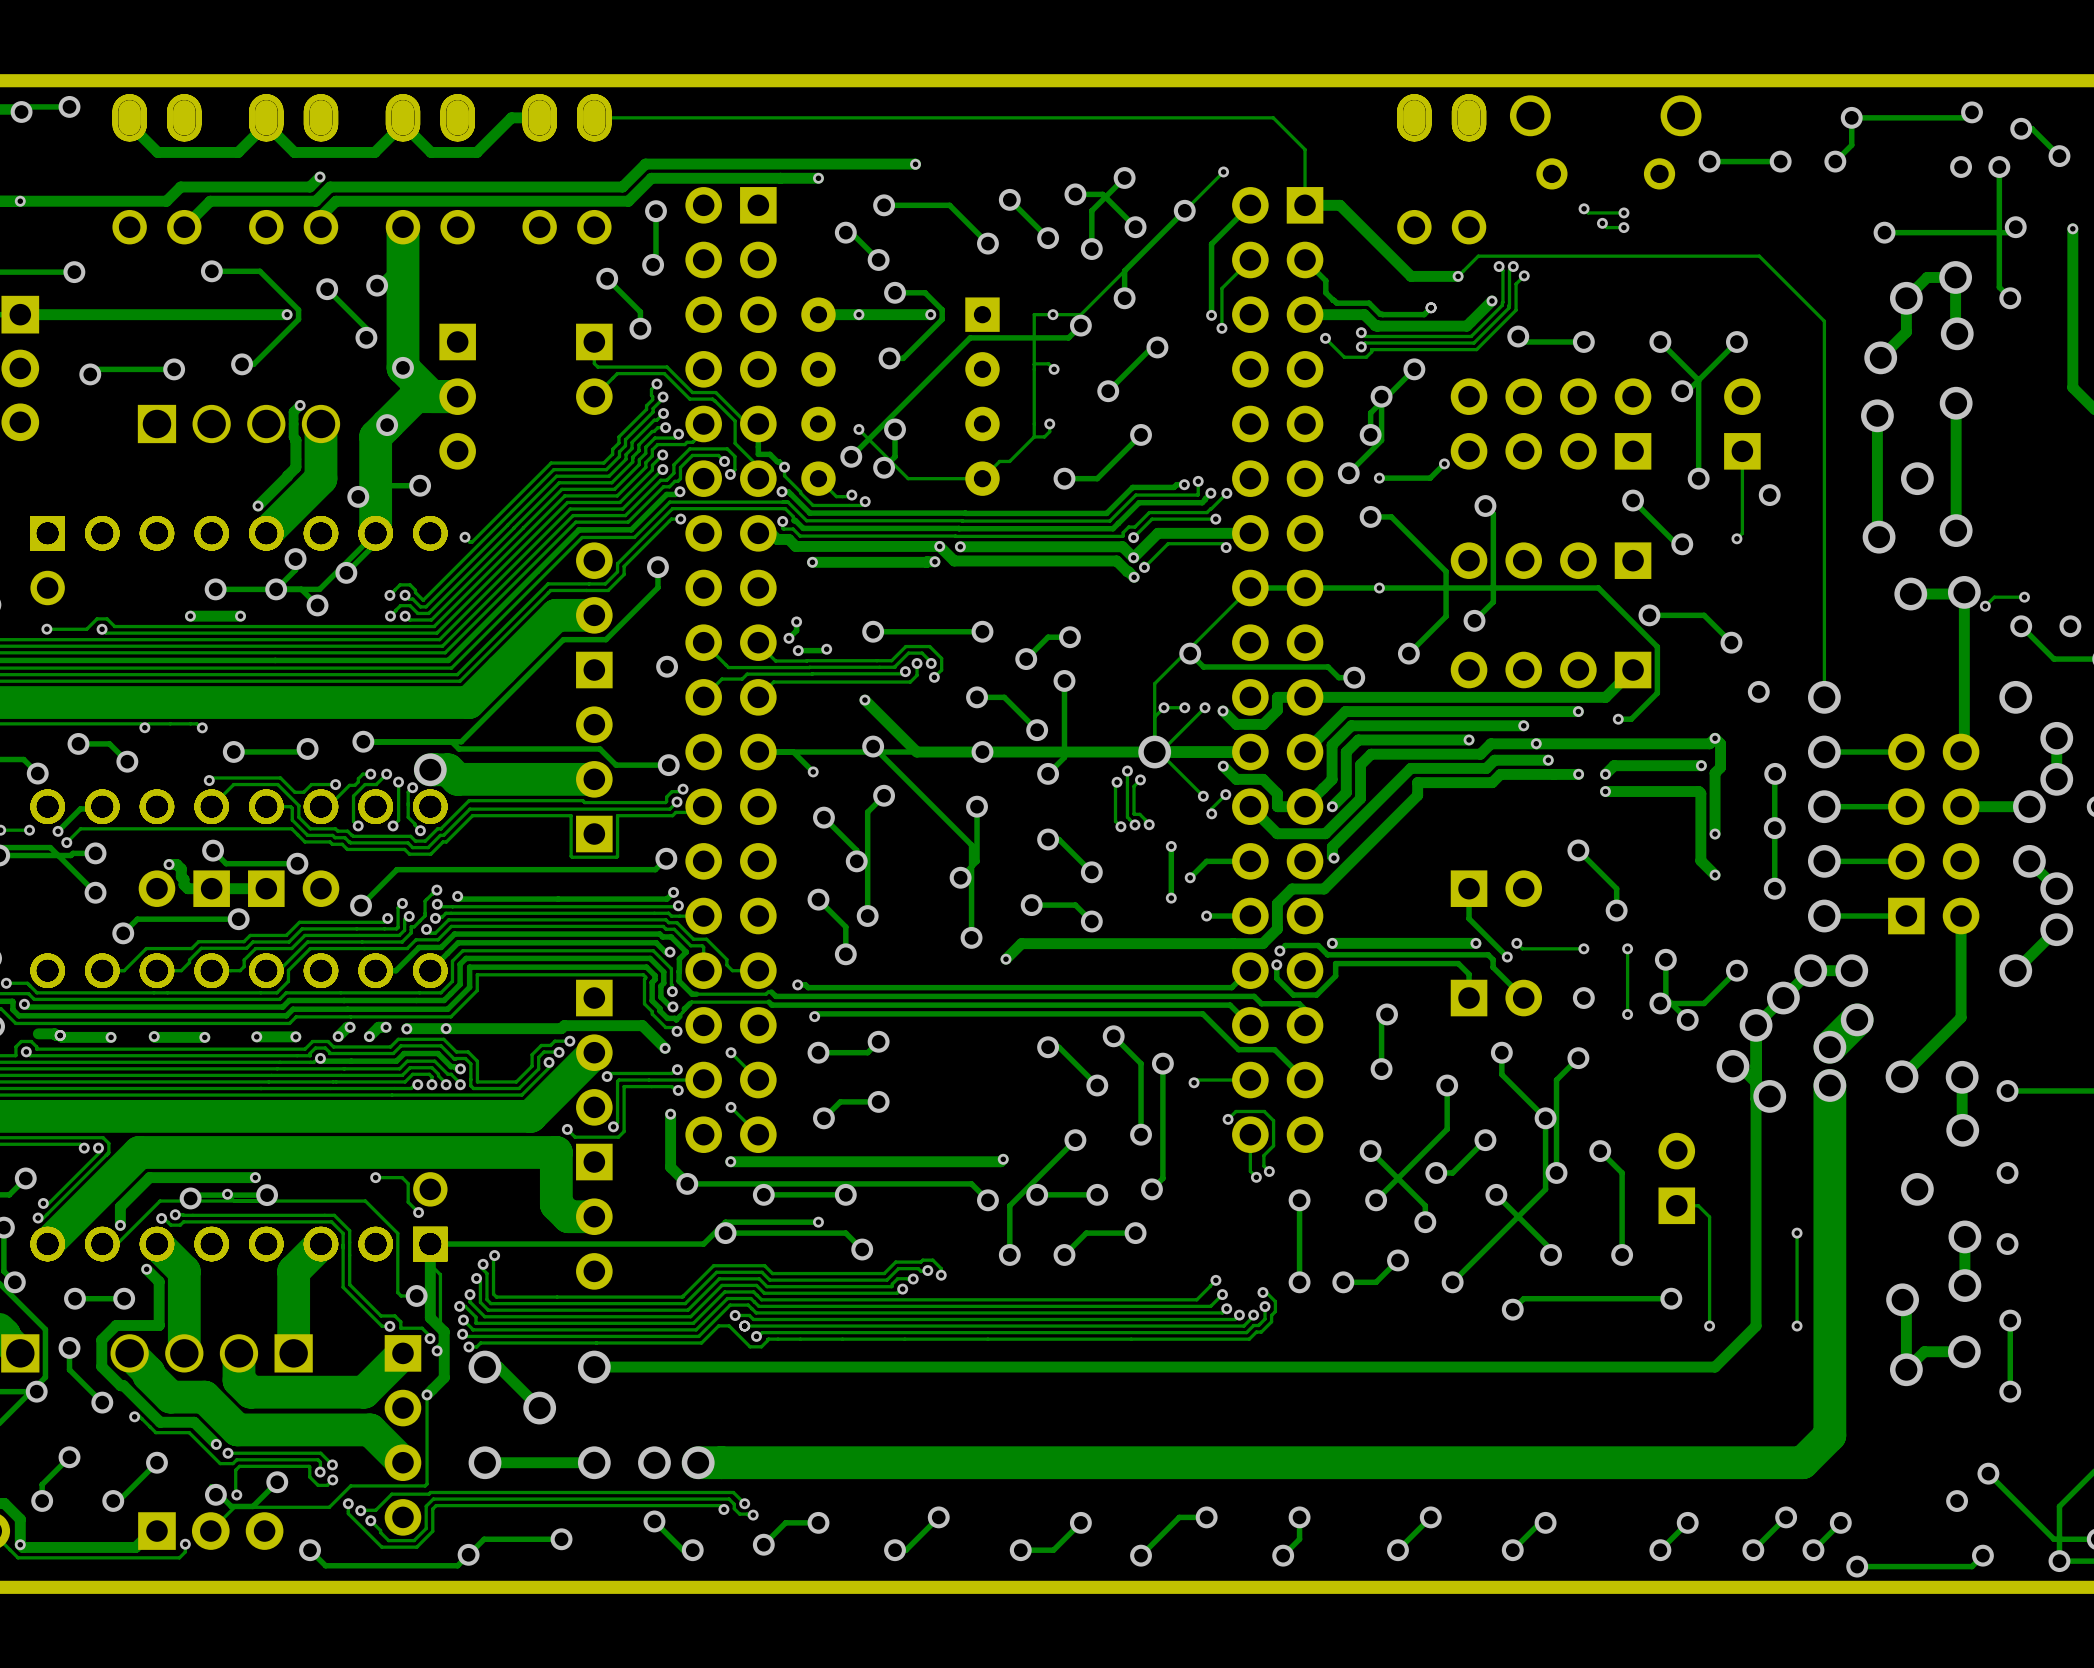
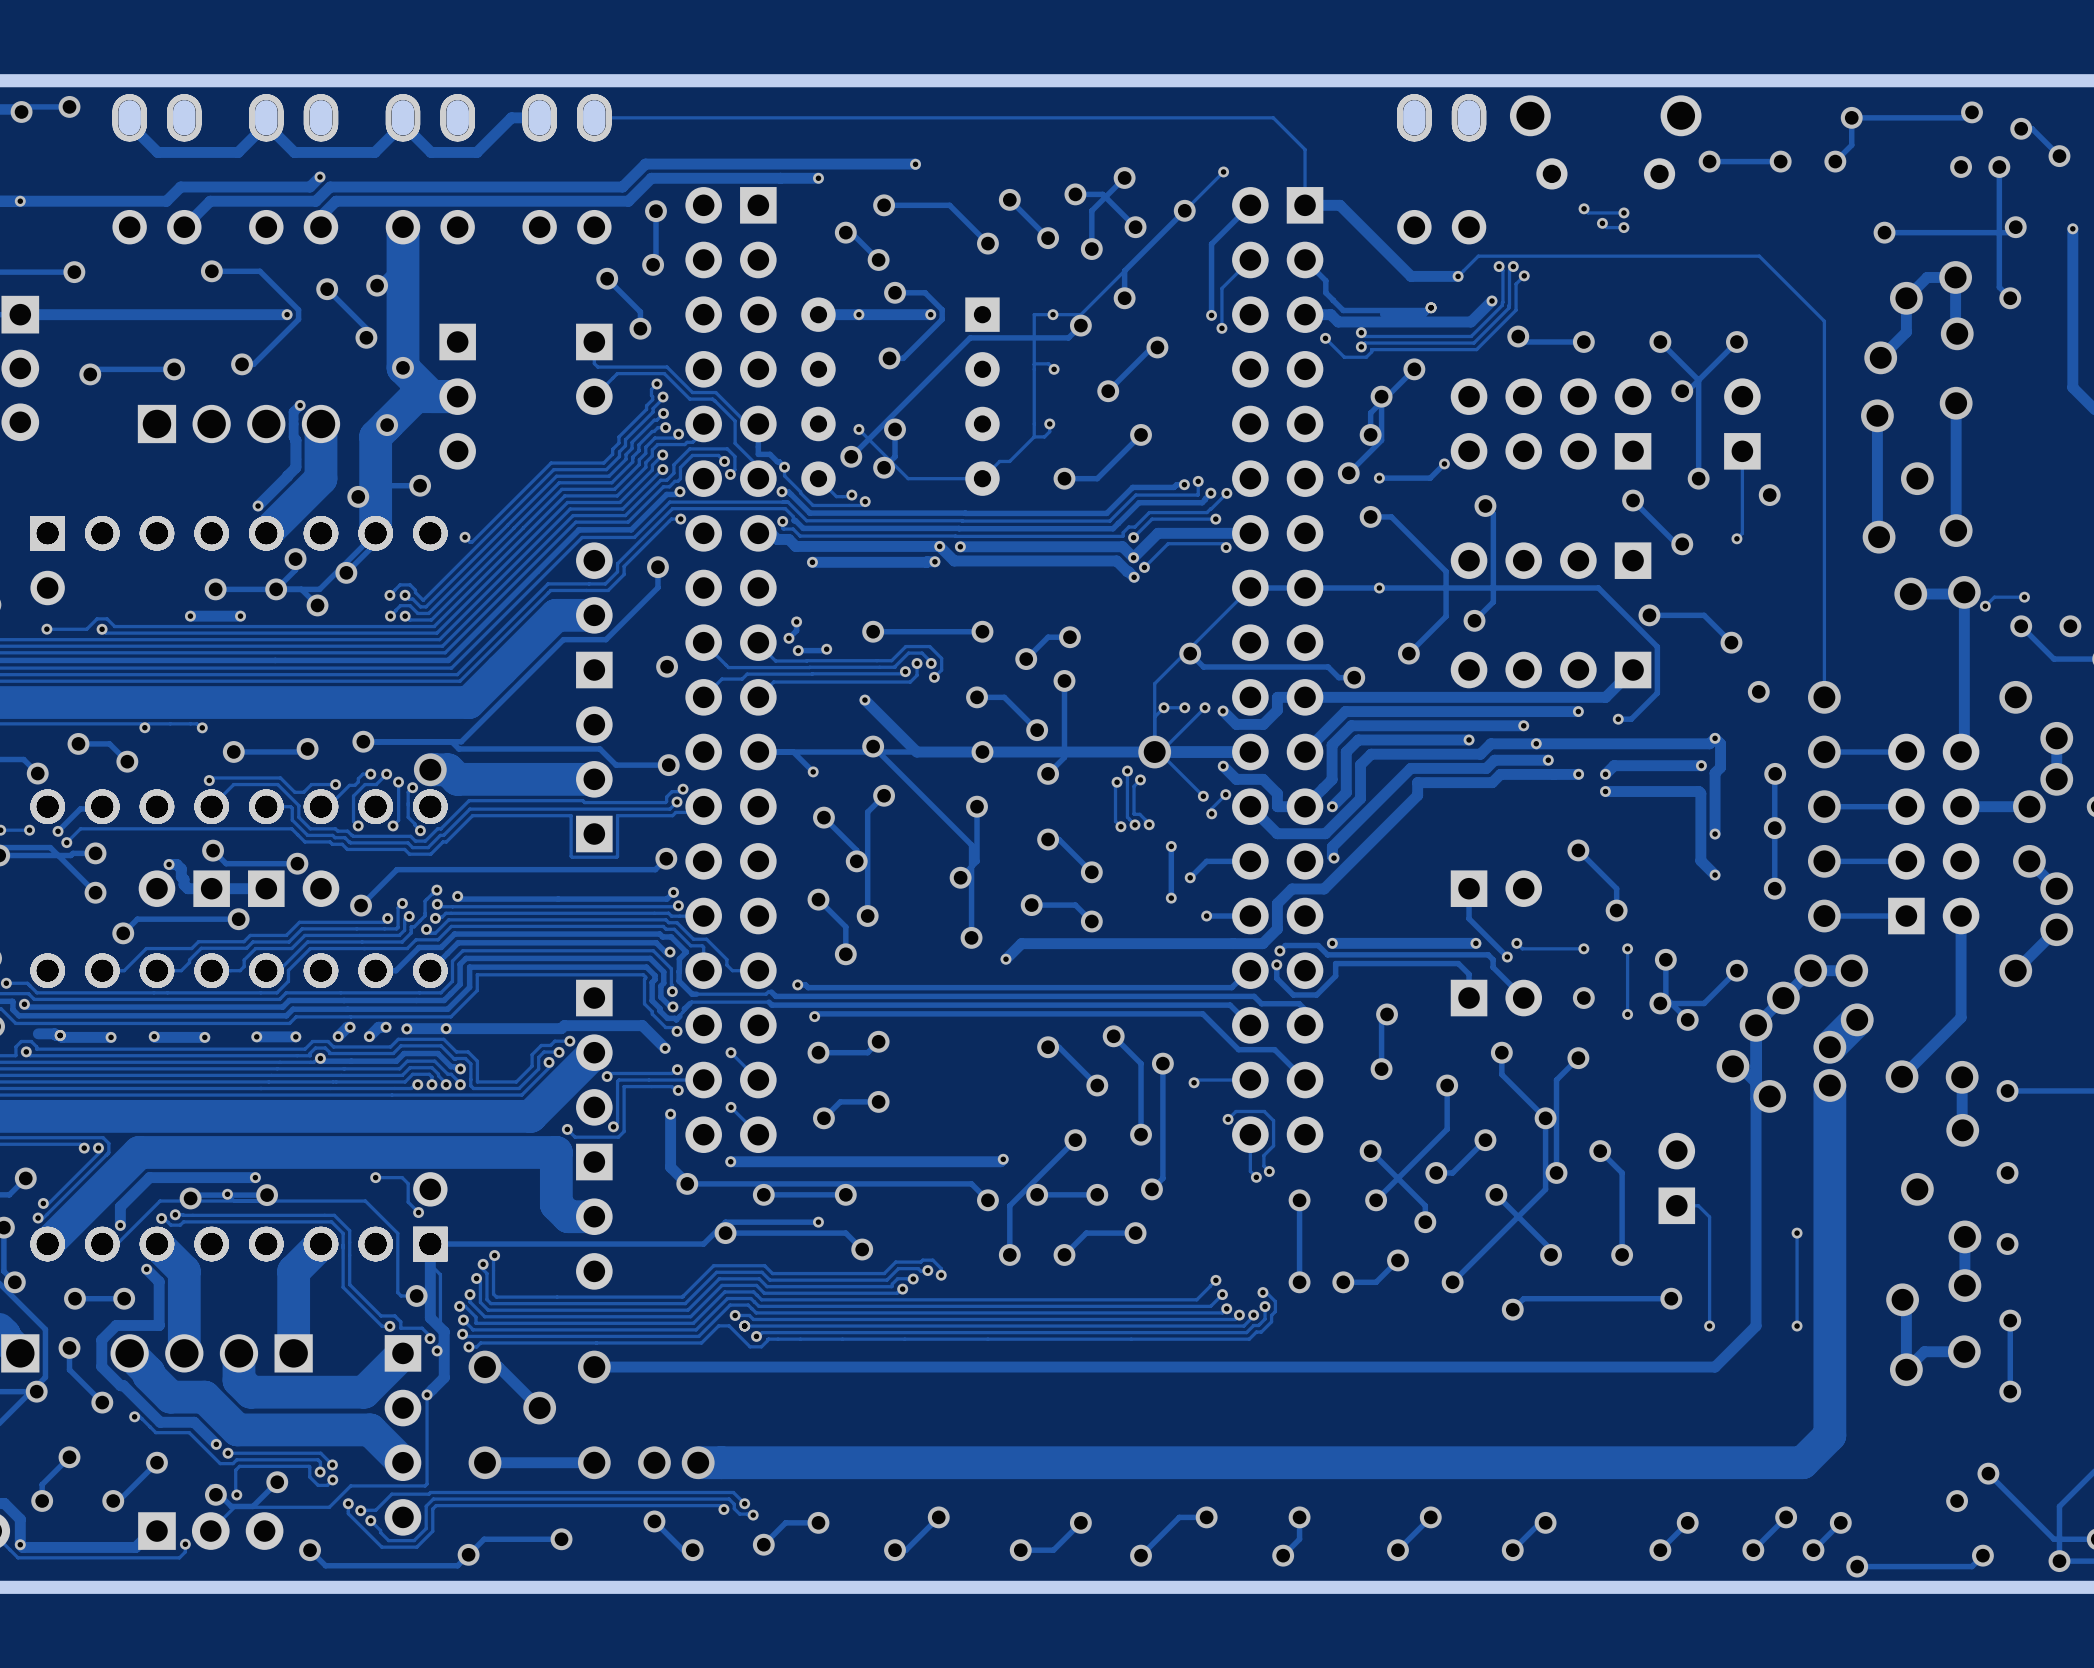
track: (1333, 300) (1336, 303) (1369, 303) (1382, 314) -> (1333, 300) (1343, 310) (1427, 310) (1430, 307)
track: (1330, 314) (1364, 314) (1377, 325) -> none
track: (1471, 321) (1466, 326) (1377, 326) -> (1471, 321) (1338, 321) (1330, 314)

